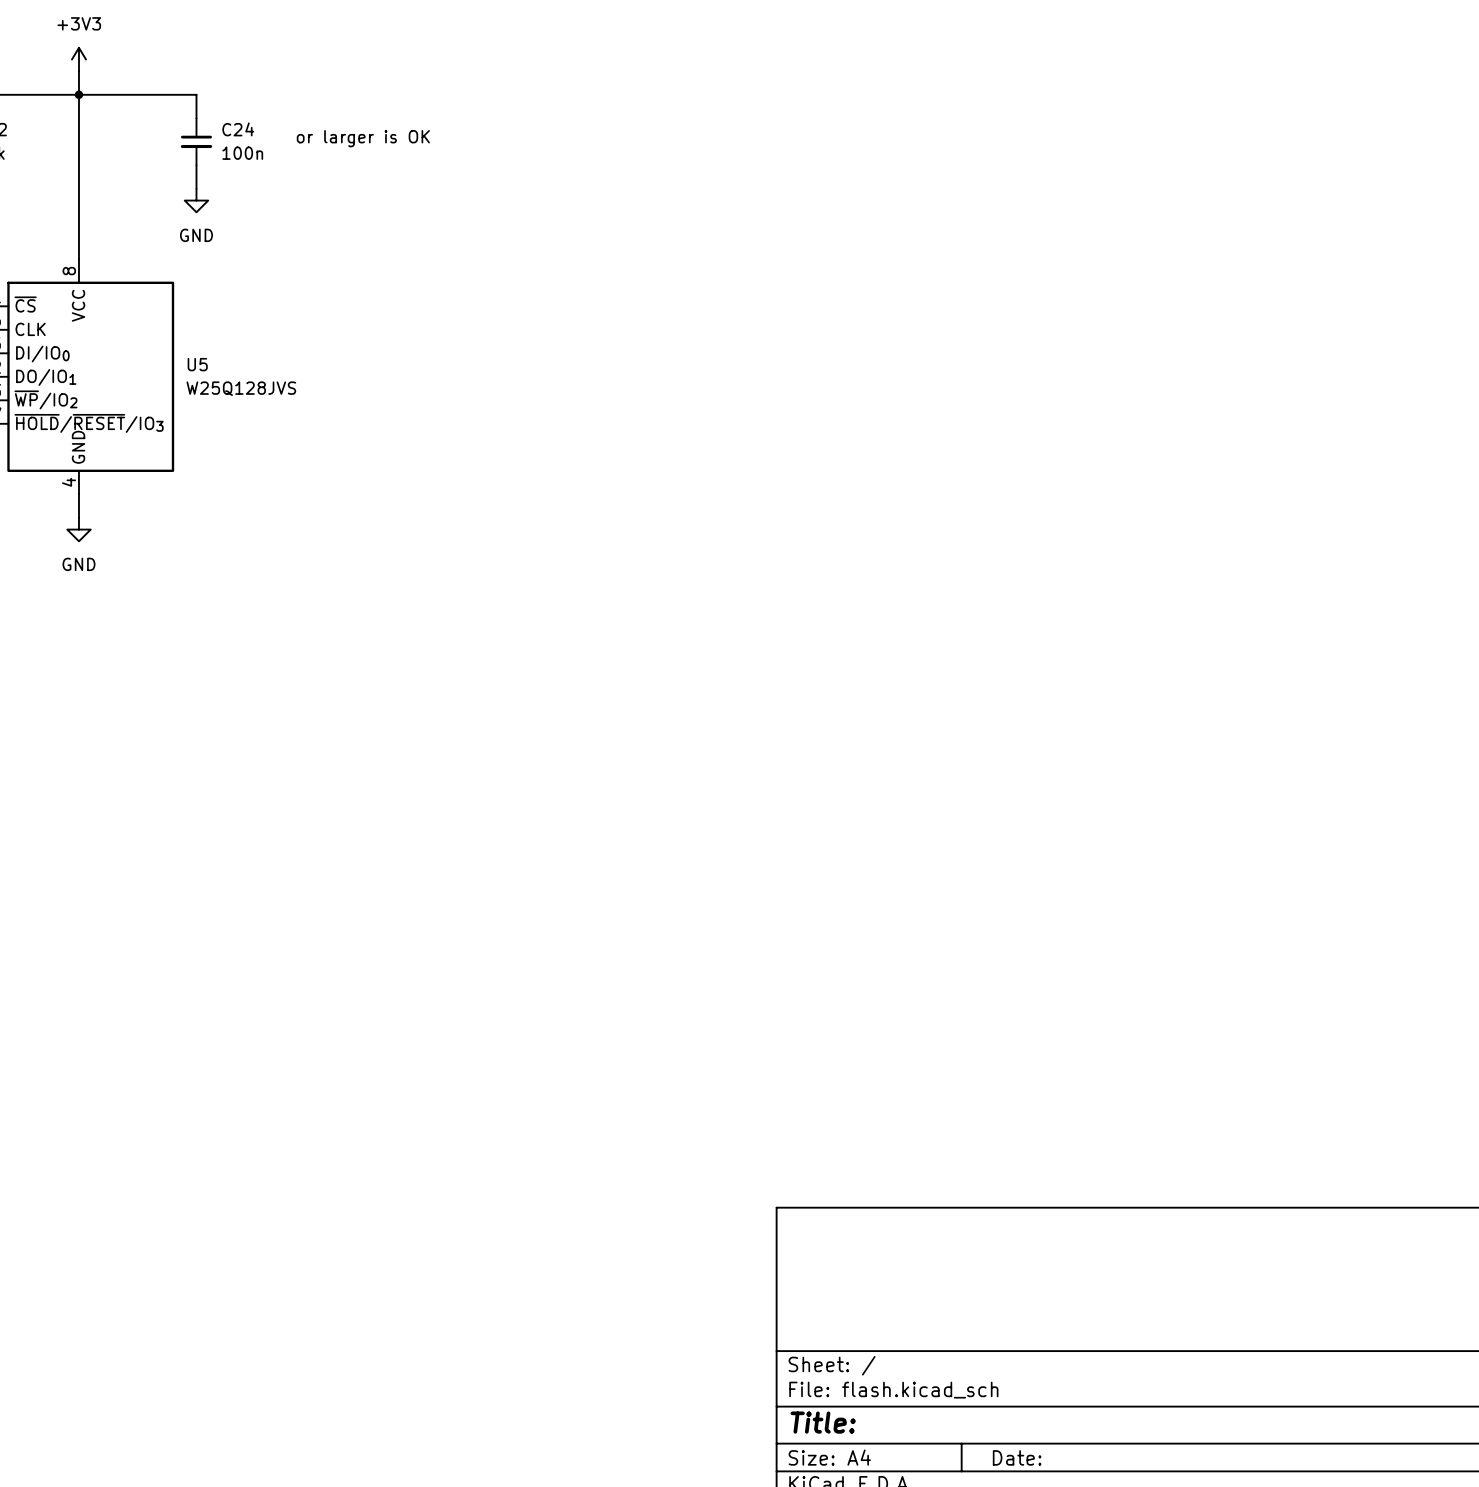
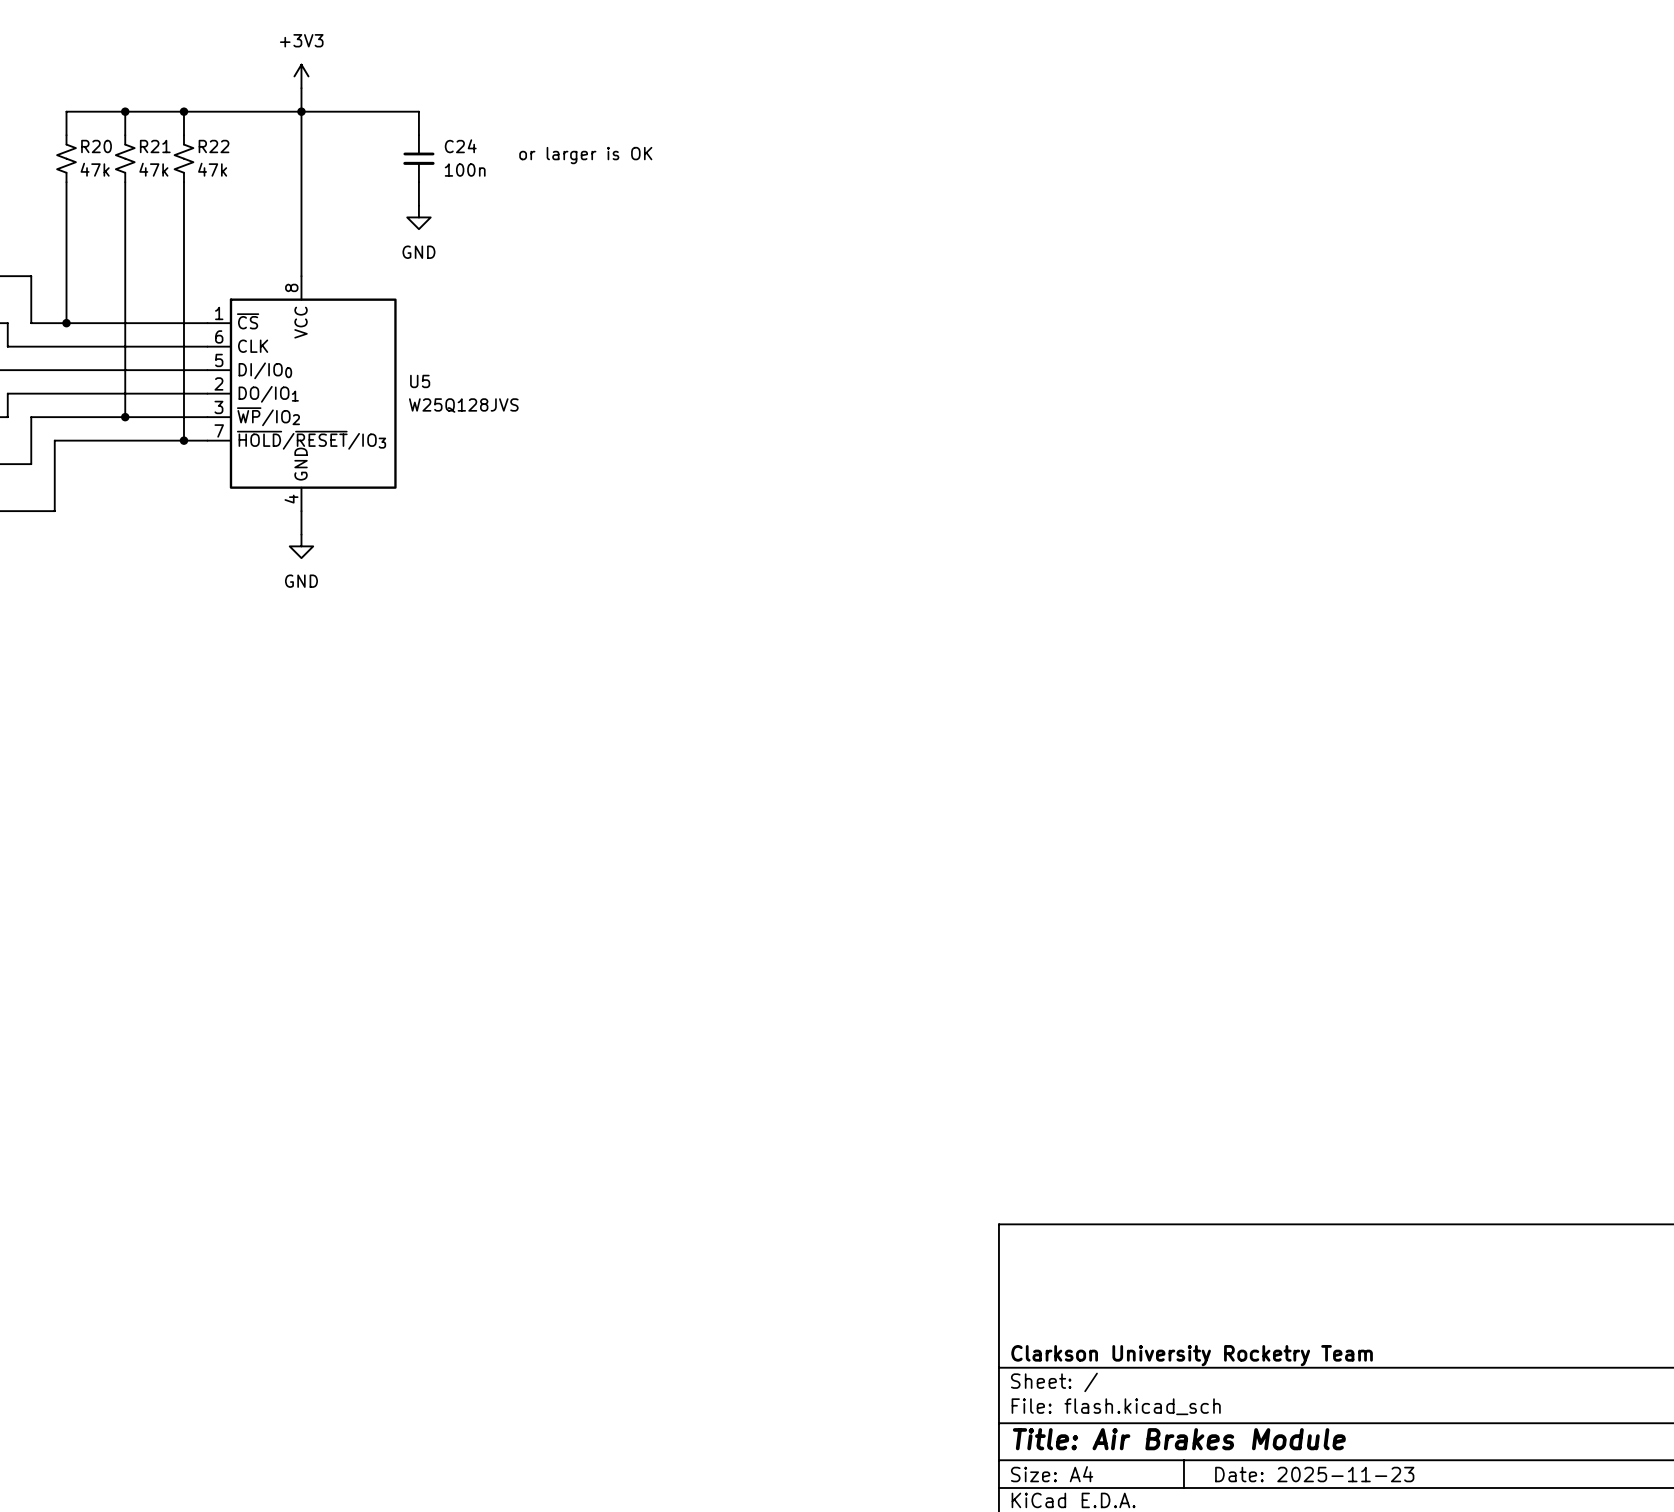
title block: none -> Clarkson University Rocketry Team (1192, 1355)
title block: Title: (823, 1422) -> Title: Air Brakes Module (1179, 1439)
title block: Date: (1017, 1457) -> Date: 2025-11-23 (1314, 1474)

